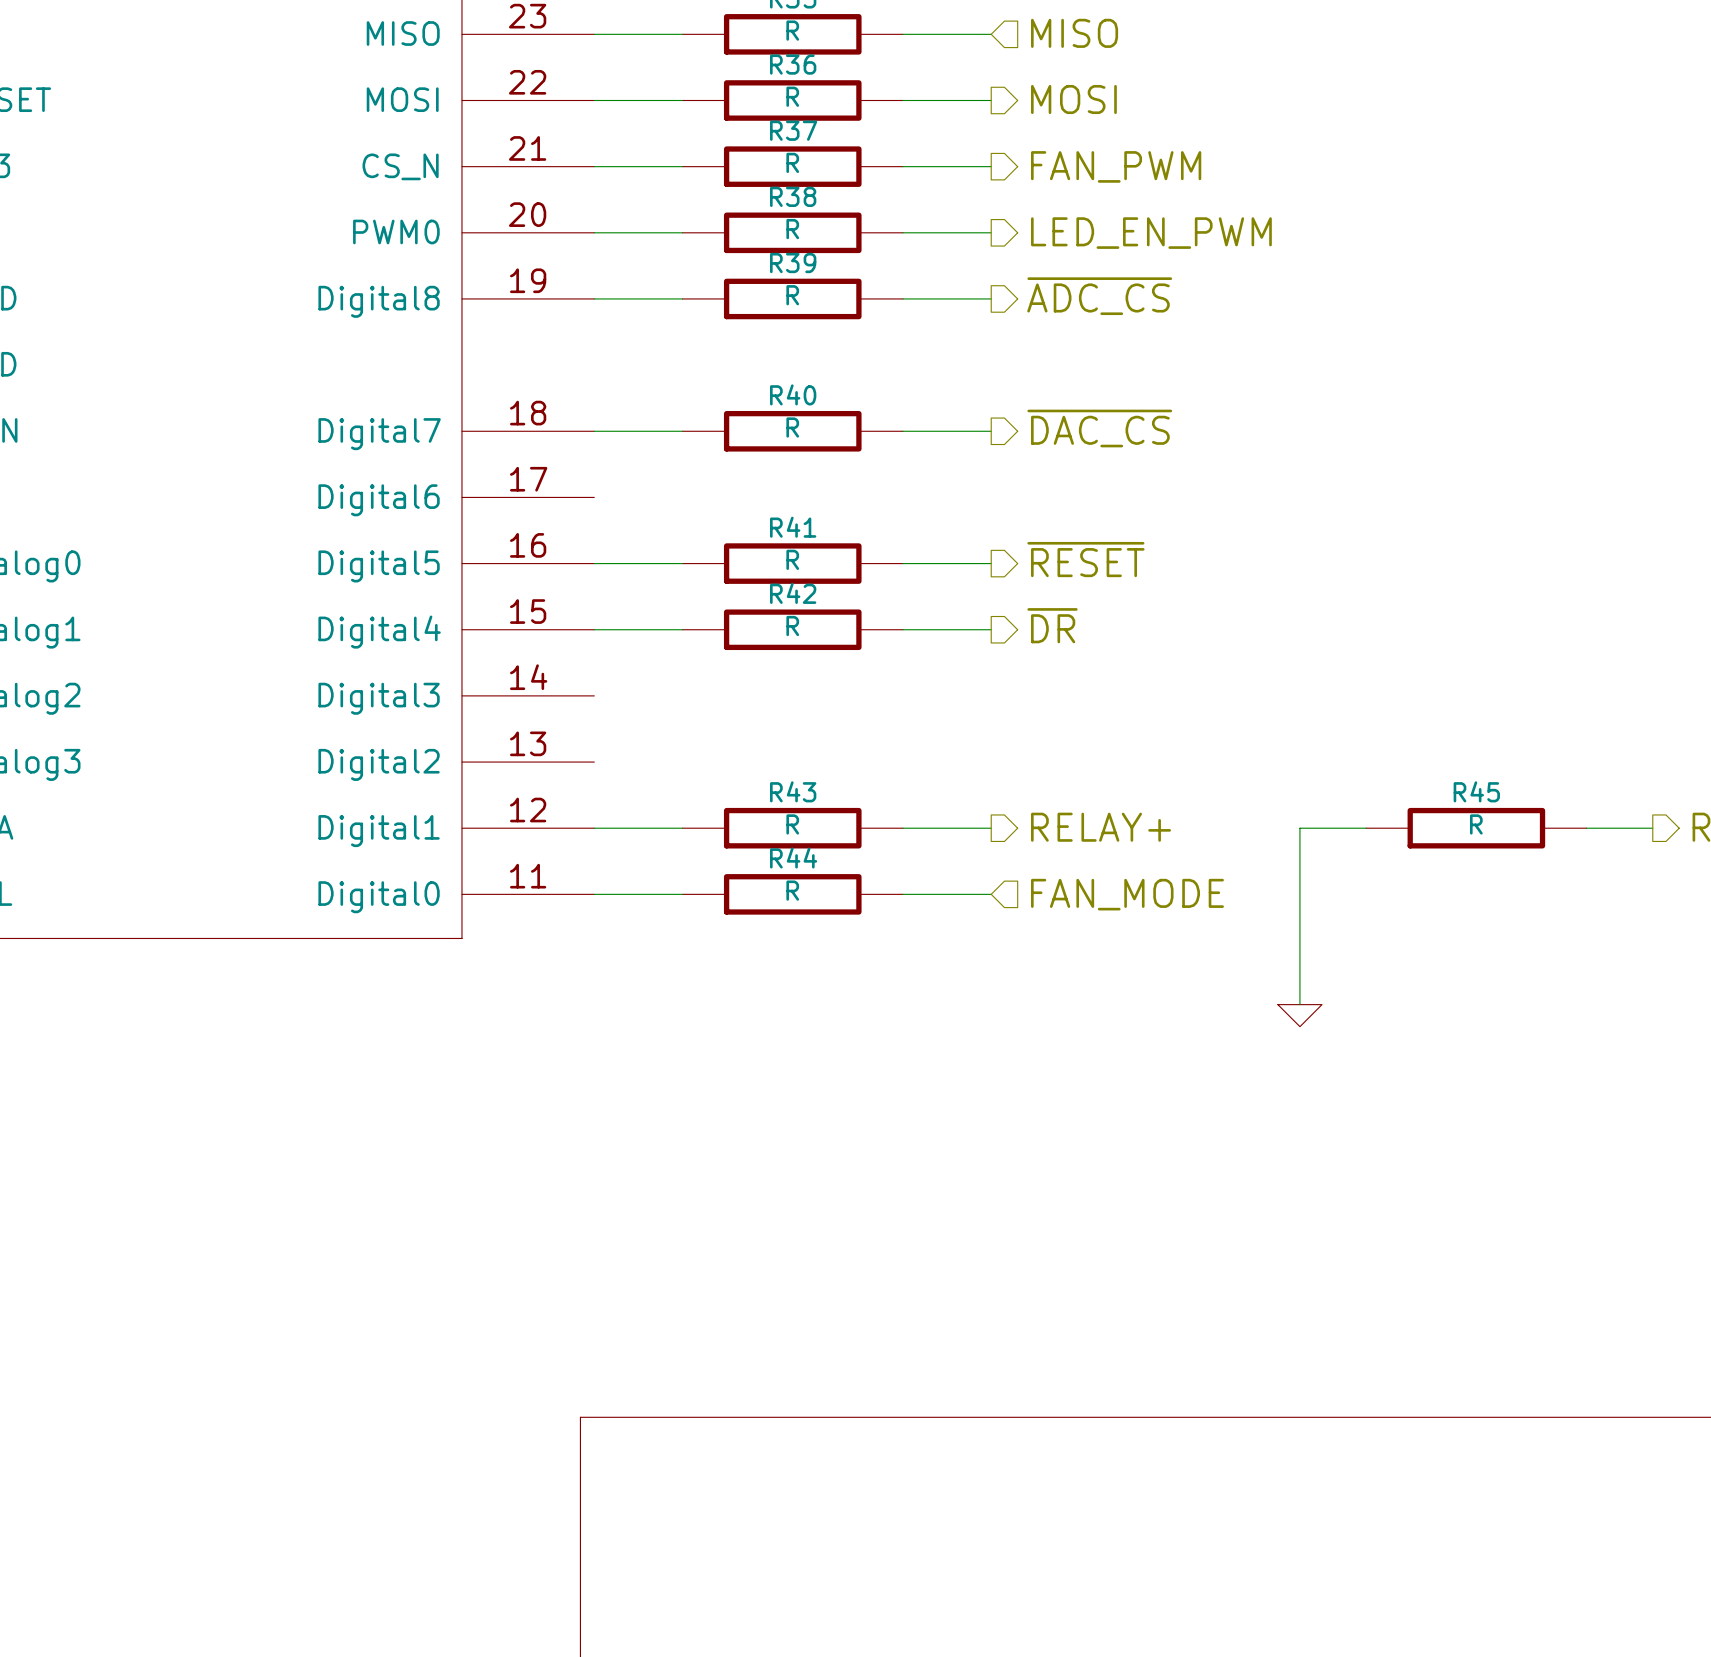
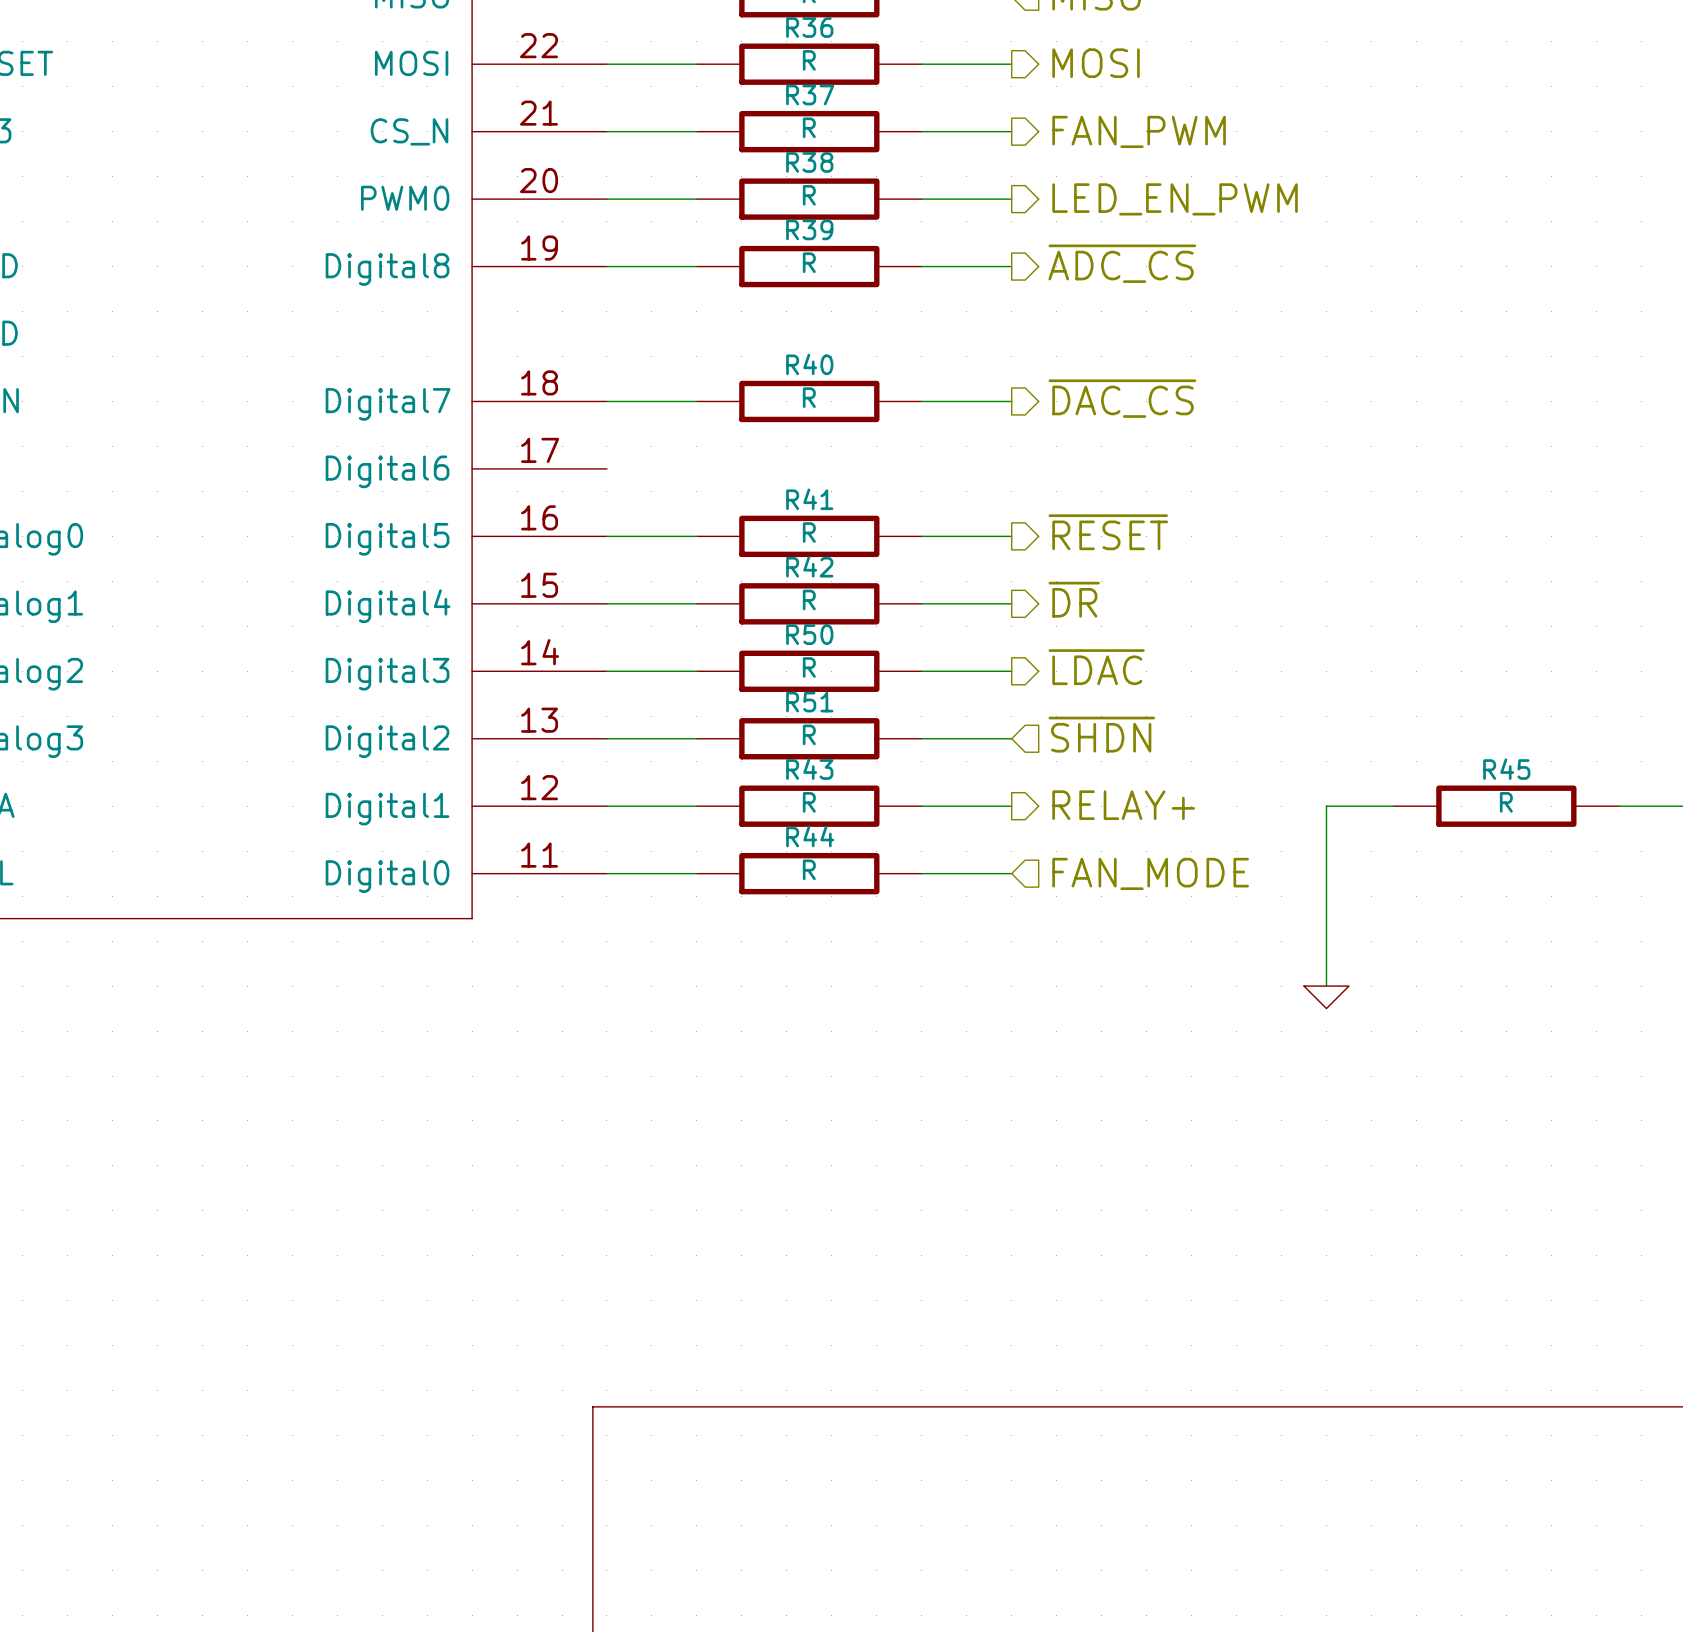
hierarchical label: none -> ~{LDAC} (1096, 667)
wire: none -> (606, 671) (696, 671)
R50: none -> R (809, 671)
wire: none -> (921, 671) (1011, 671)
hierarchical label: none -> ~{SHDN} (1101, 734)
wire: none -> (606, 738) (696, 738)
R51: none -> R (809, 738)
wire: none -> (921, 738) (1011, 738)

